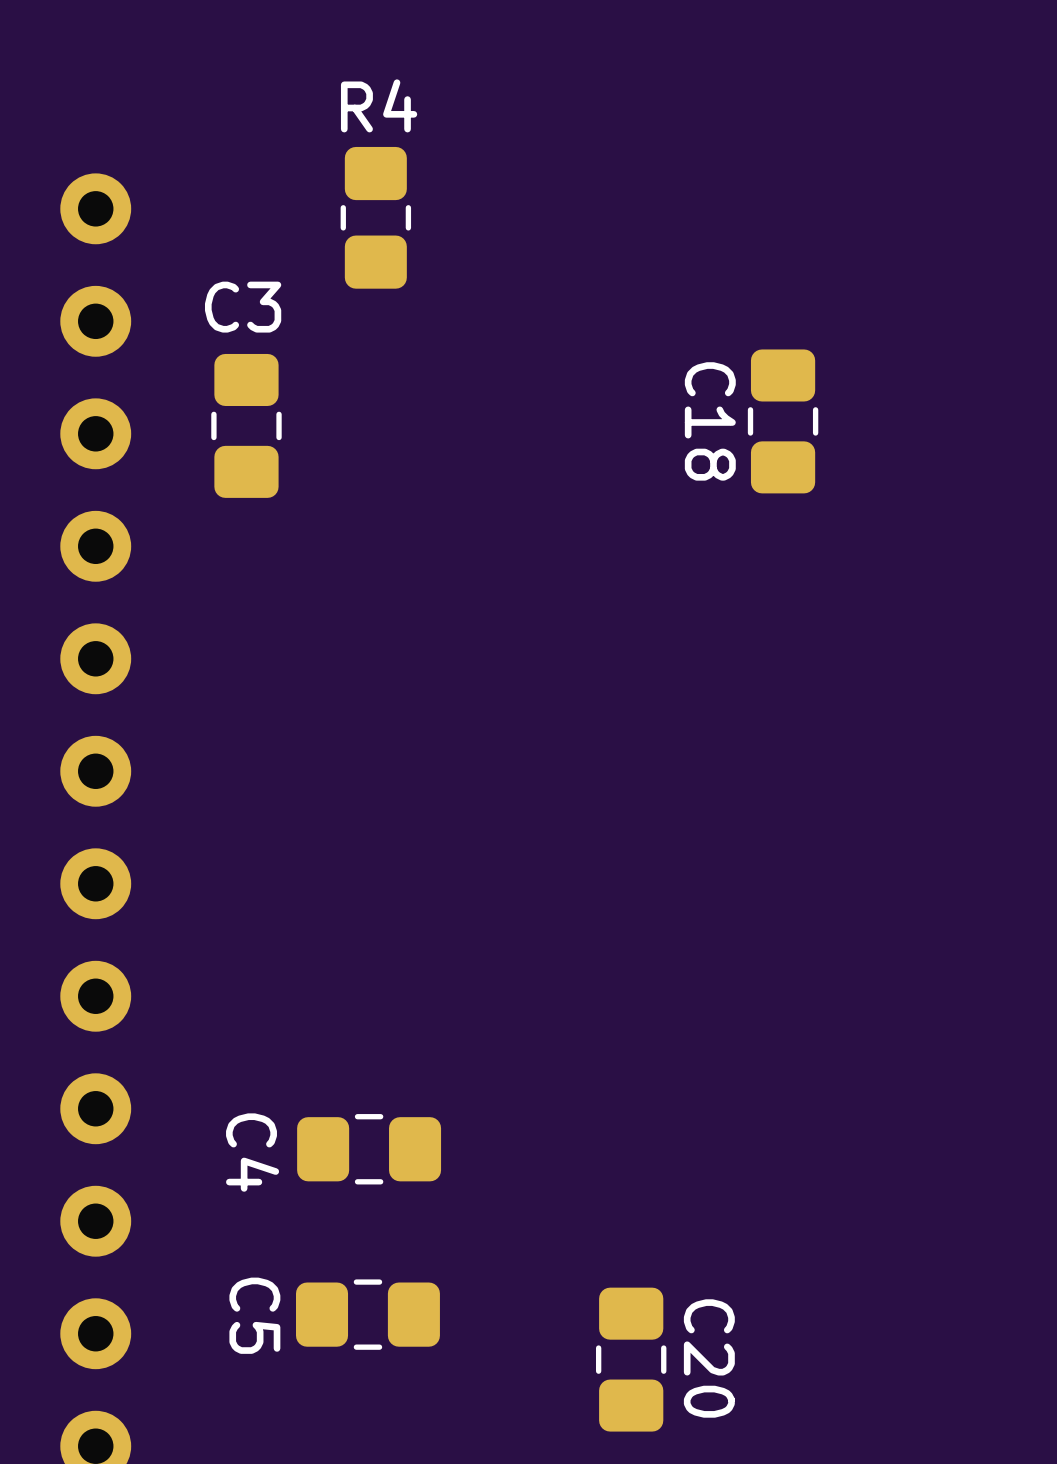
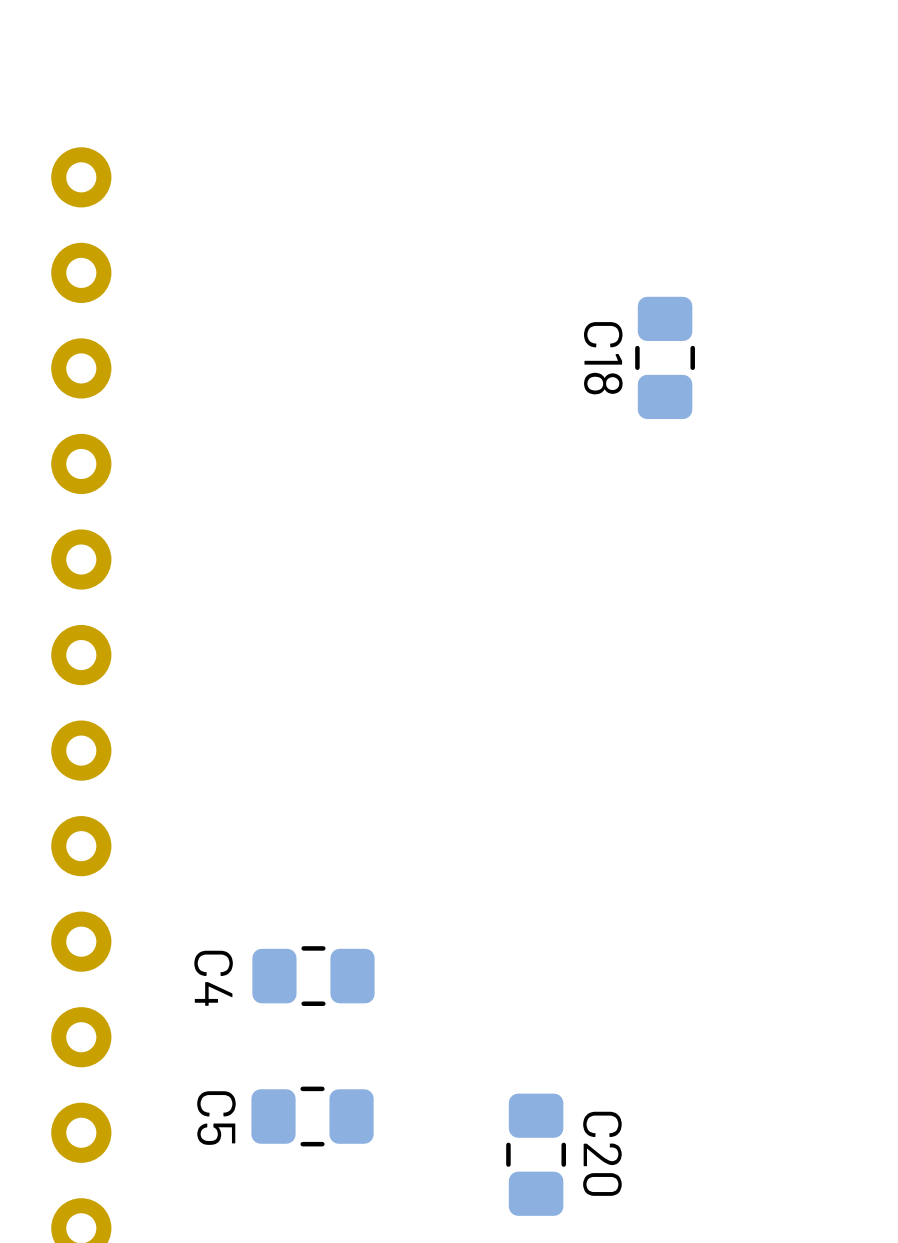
R4: (375, 217) -> none
C3: (246, 425) -> none

